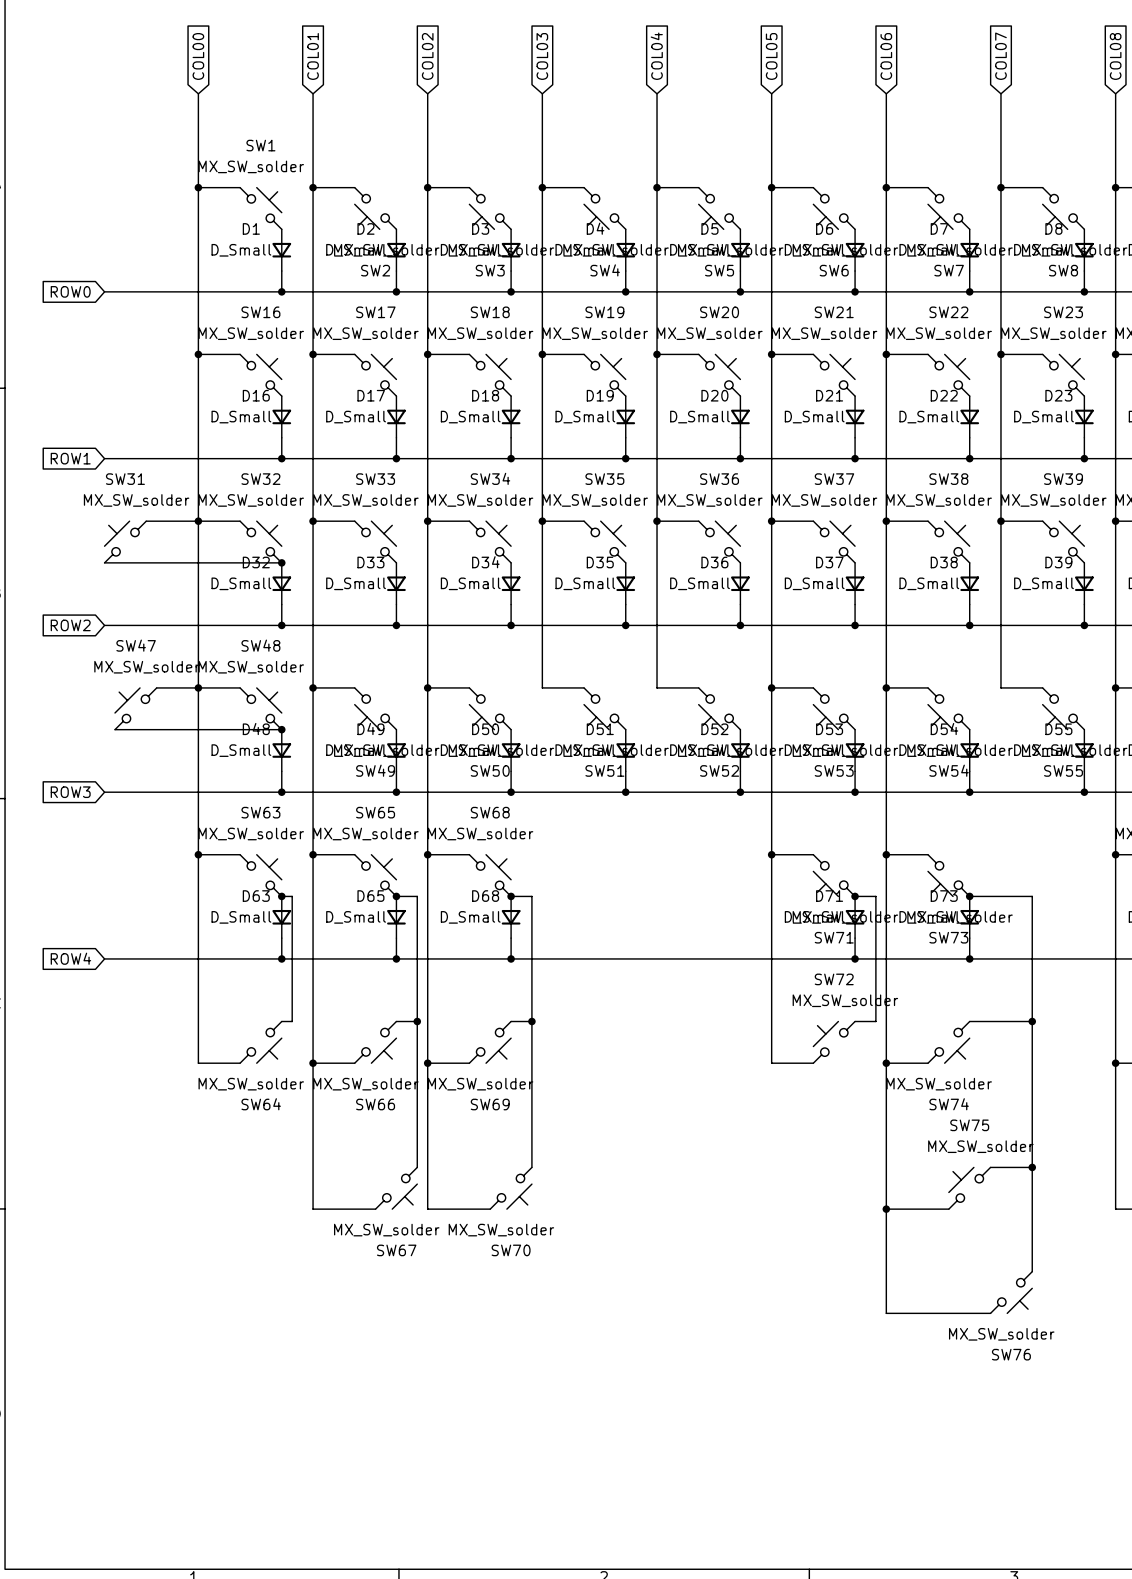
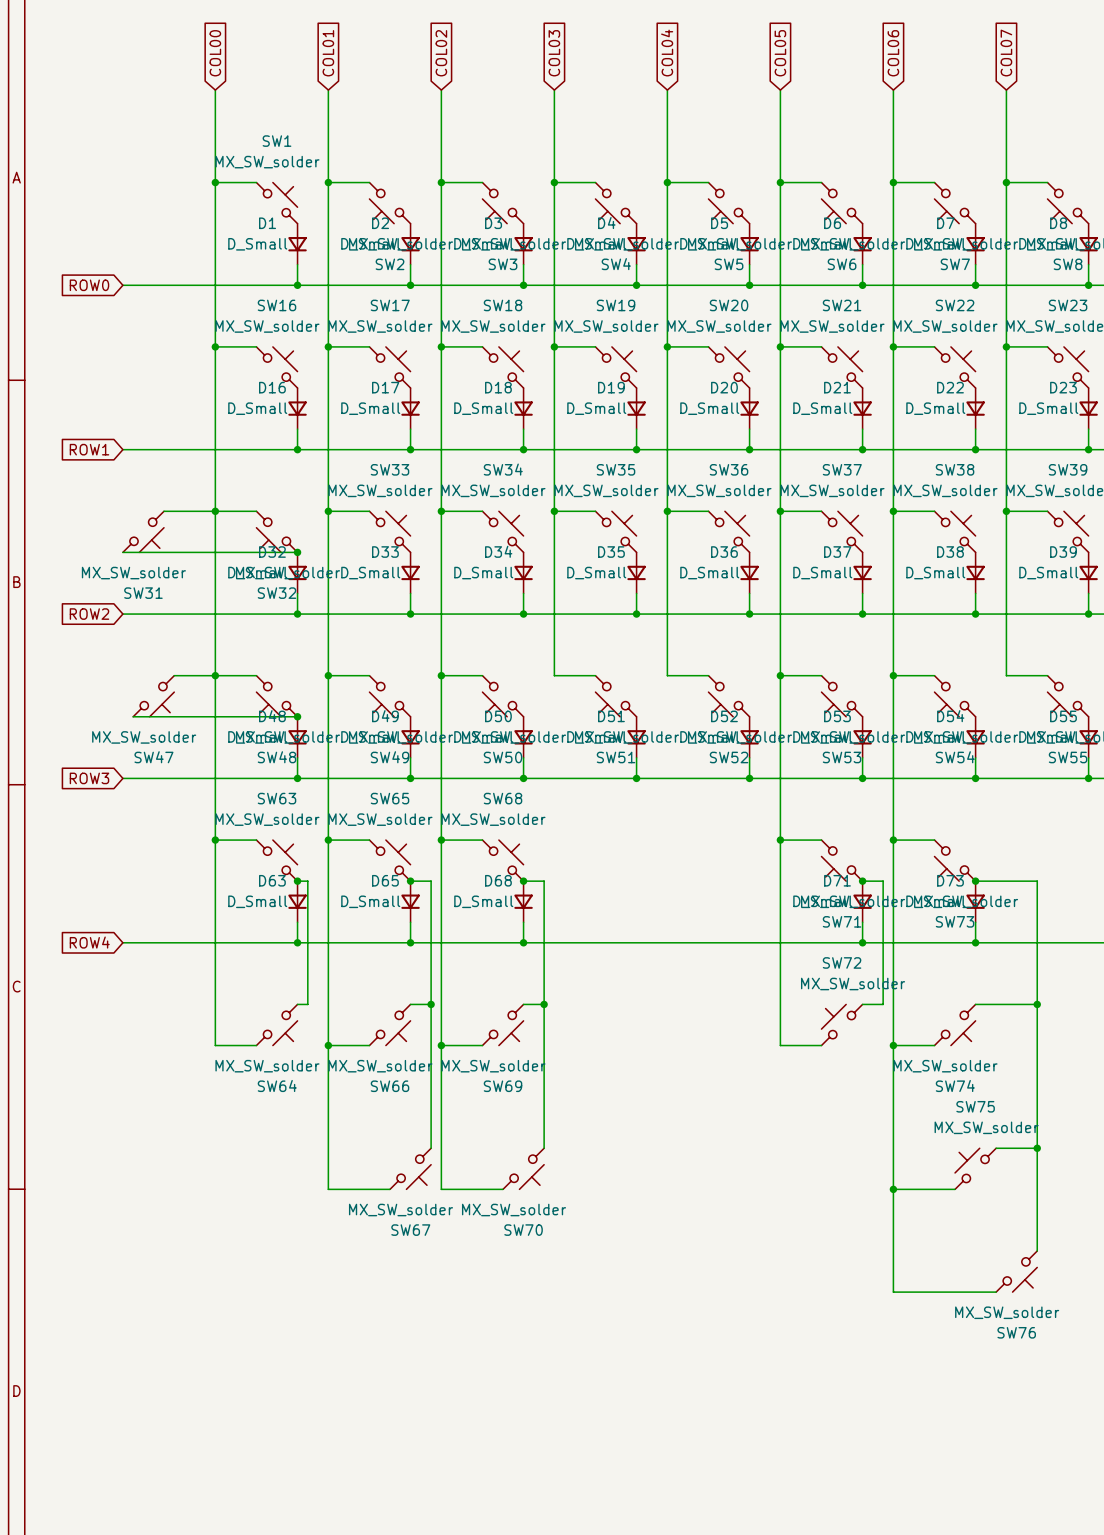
SW31 rotation: 0° (125, 542) -> 180° (143, 531)
SW32 rotation: 0° (260, 542) -> 180° (276, 531)
SW47 rotation: 0° (135, 708) -> 180° (153, 696)
SW48 rotation: 0° (260, 708) -> 180° (276, 696)

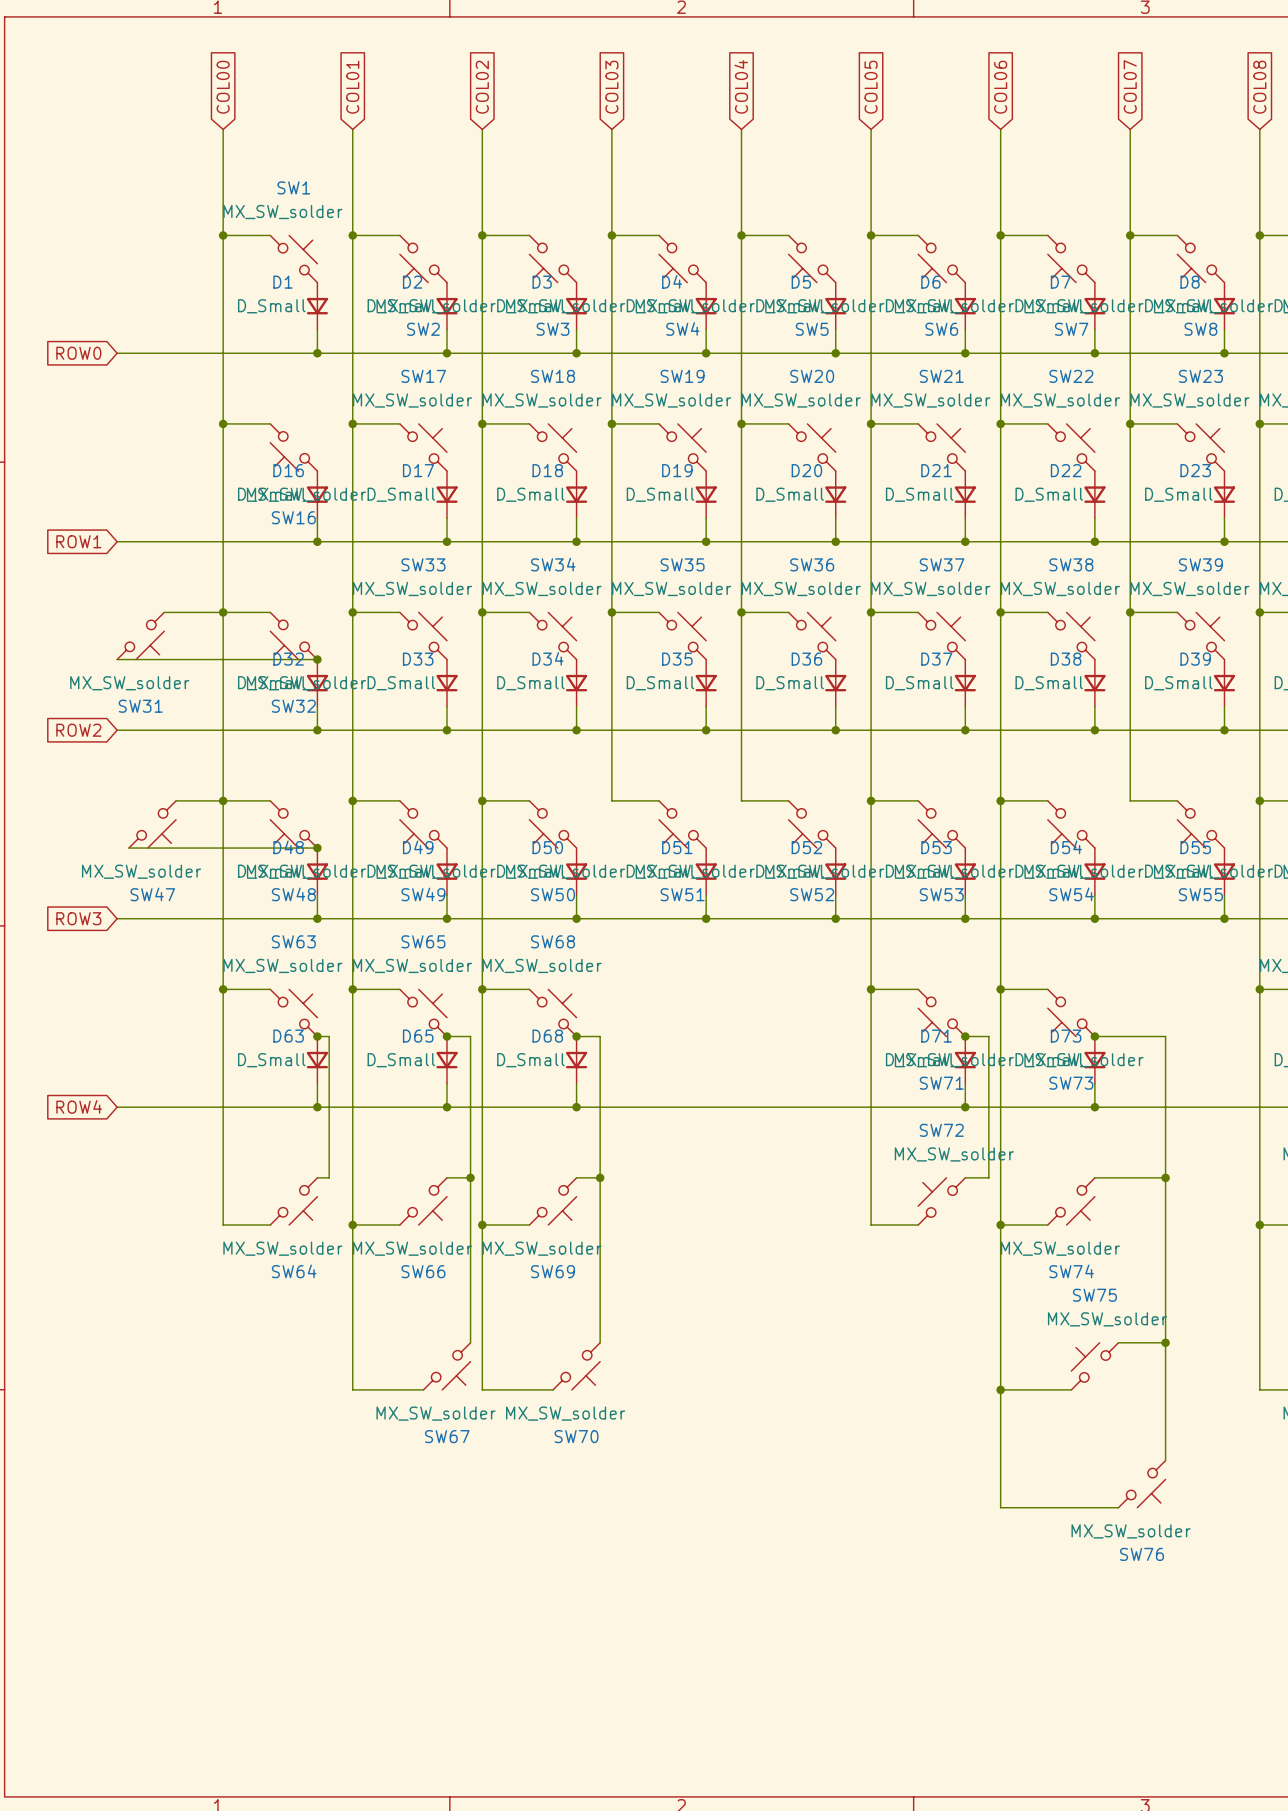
SW16 rotation: 0° (276, 367) -> 180° (293, 447)

